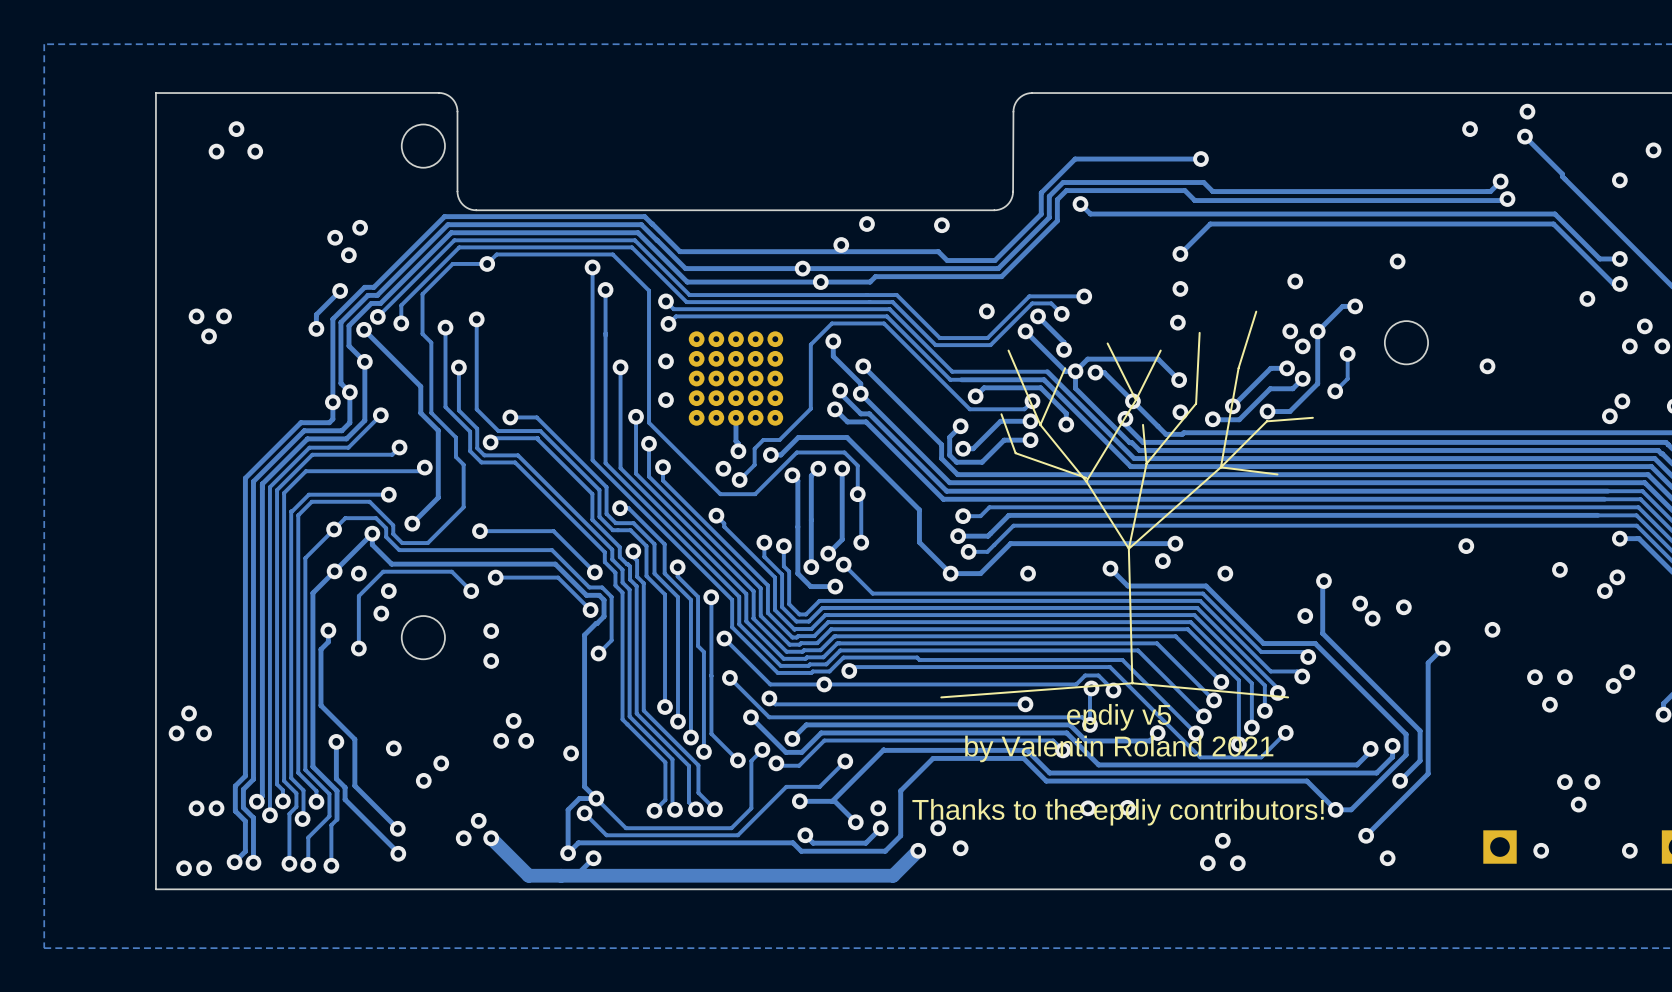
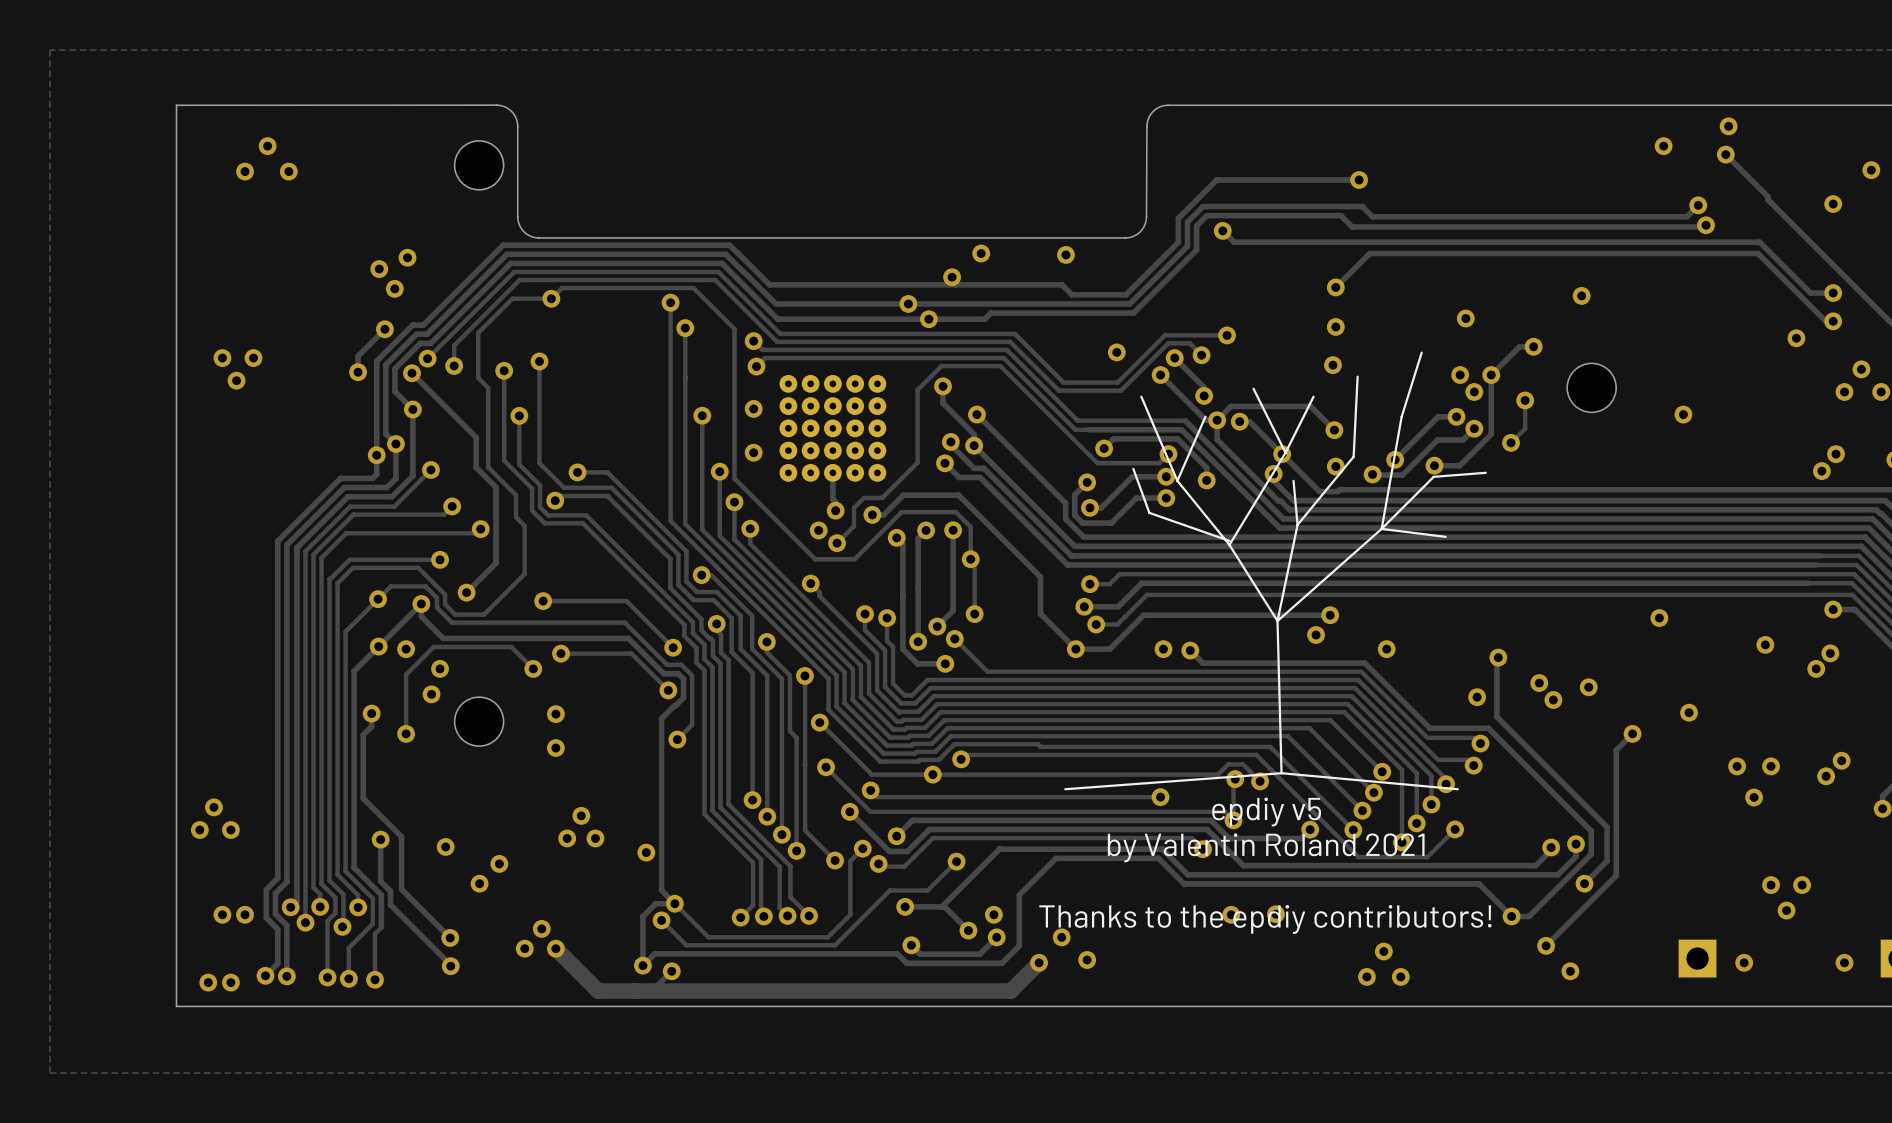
track: (1110, 568) (1127, 586) -> (1190, 650) (1202, 663) (1276, 663)
via position: (1110, 568) -> (1190, 650)

